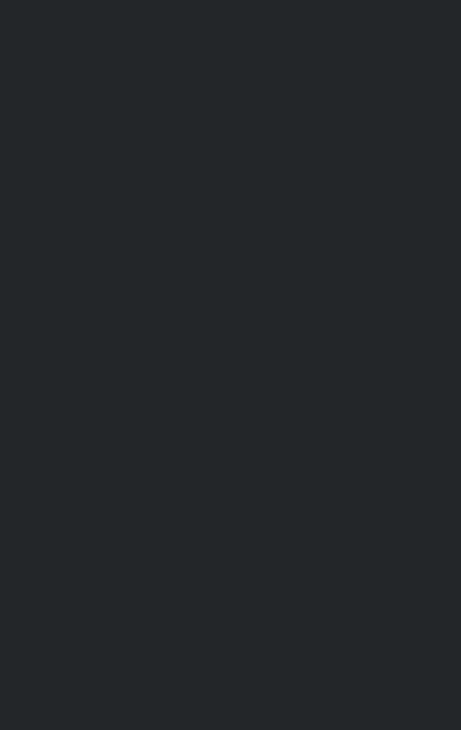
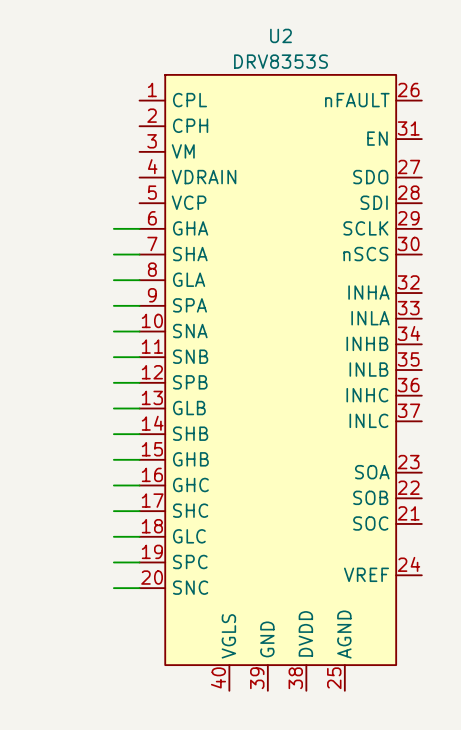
wire: none -> (113, 228) (139, 228)
wire: none -> (113, 254) (139, 254)
wire: none -> (113, 280) (139, 280)
wire: none -> (113, 305) (139, 305)
wire: none -> (113, 331) (139, 331)
wire: none -> (113, 357) (139, 357)
wire: none -> (113, 382) (139, 382)
U2: none -> DRV8353S (280, 382)
wire: none -> (113, 408) (139, 408)
wire: none -> (113, 434) (139, 434)
wire: none -> (113, 459) (139, 459)
wire: none -> (113, 485) (139, 485)
wire: none -> (113, 511) (139, 511)
wire: none -> (113, 536) (139, 536)
wire: none -> (113, 562) (139, 562)
wire: none -> (113, 588) (139, 588)

